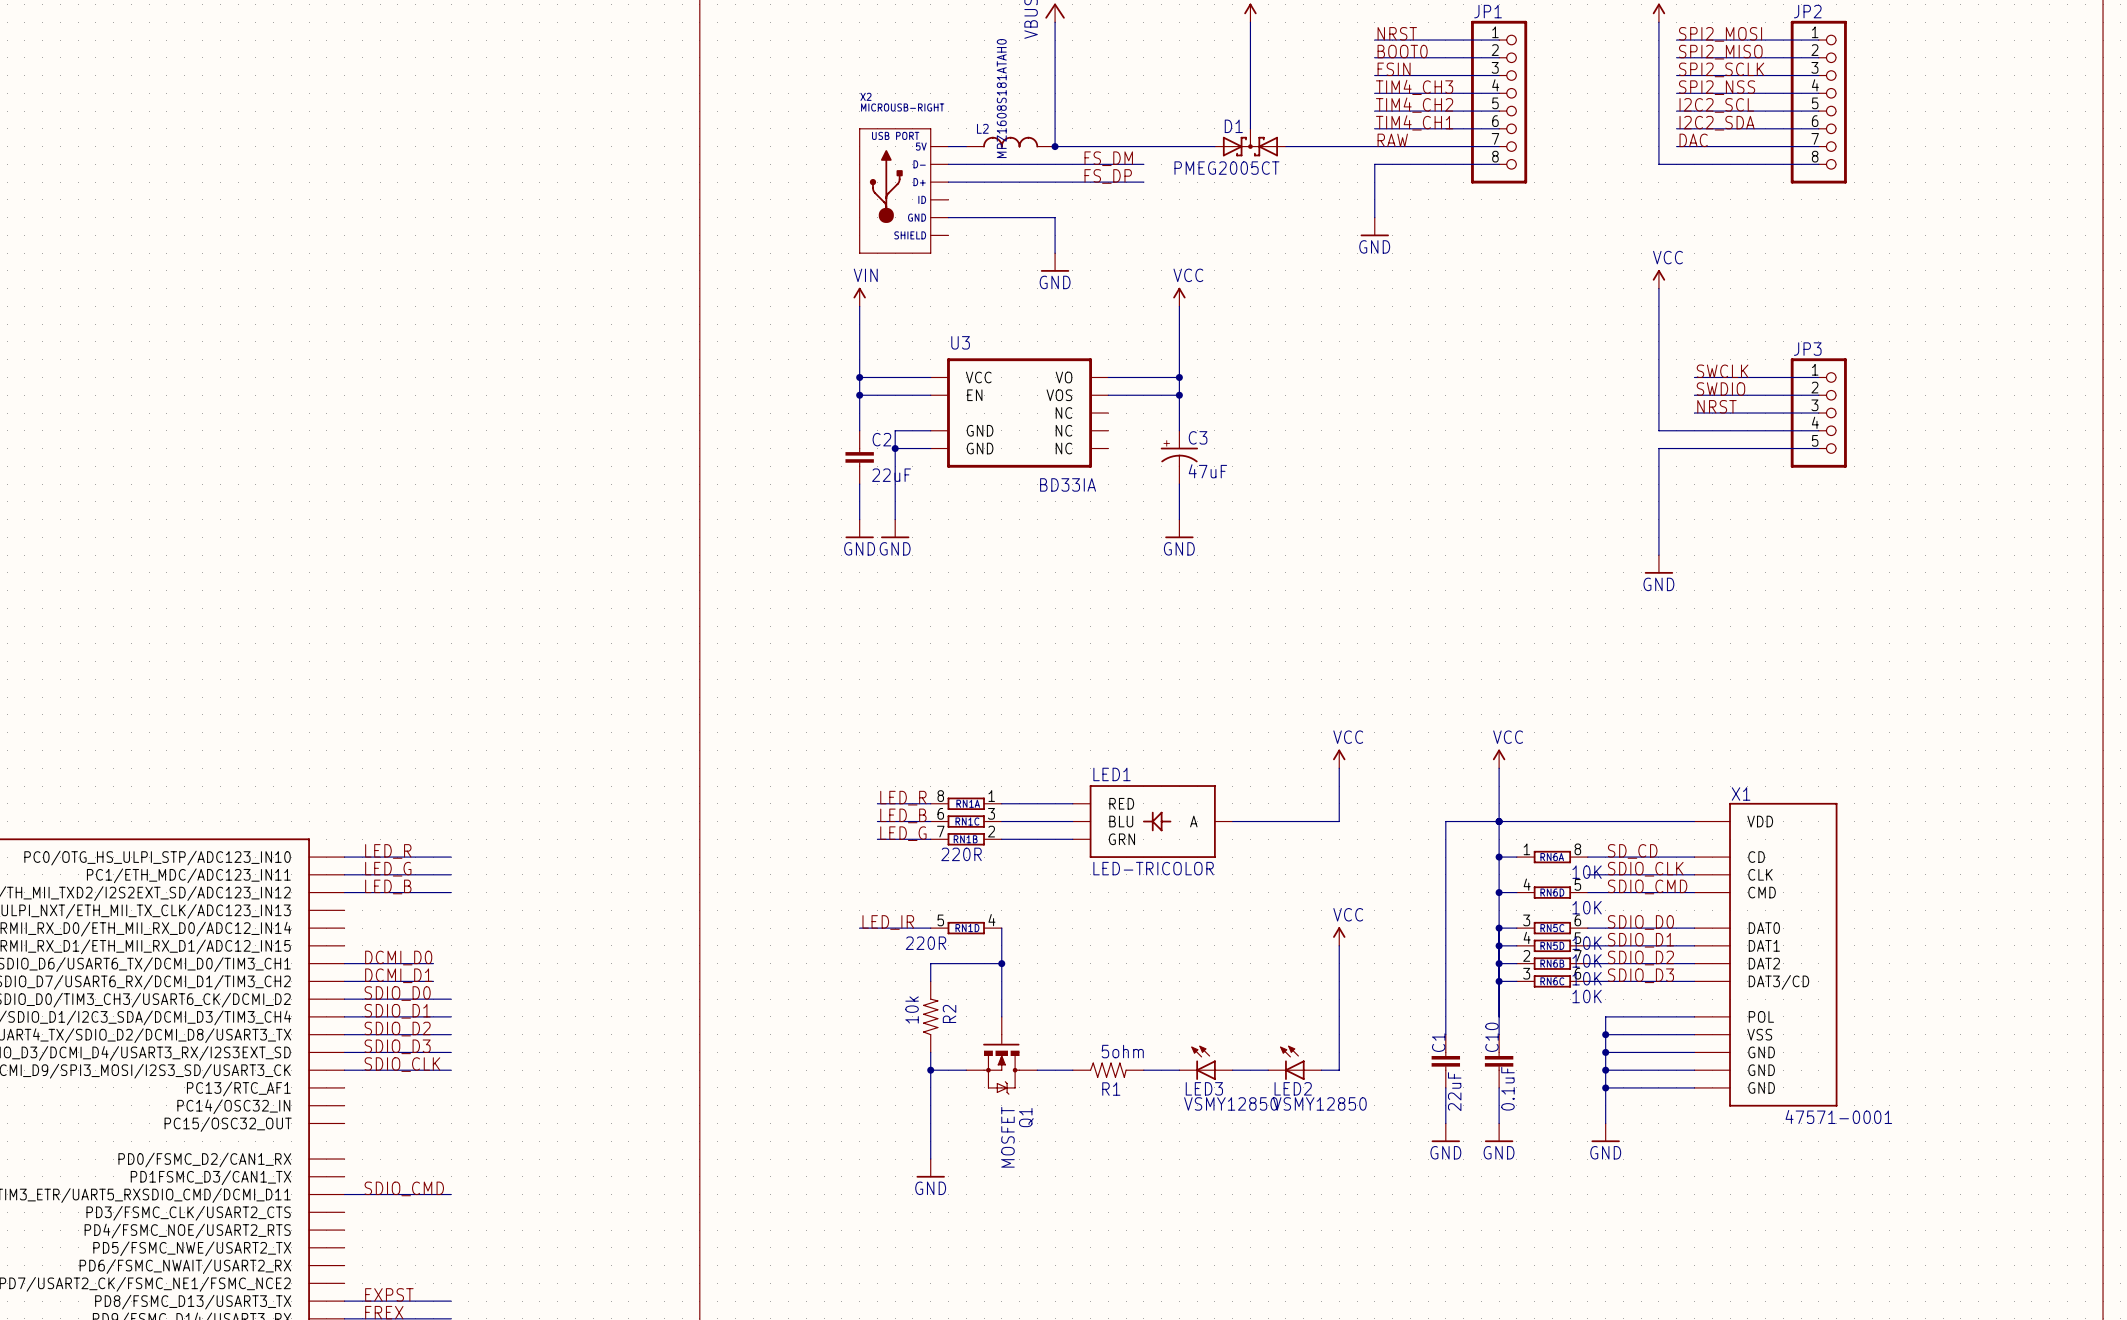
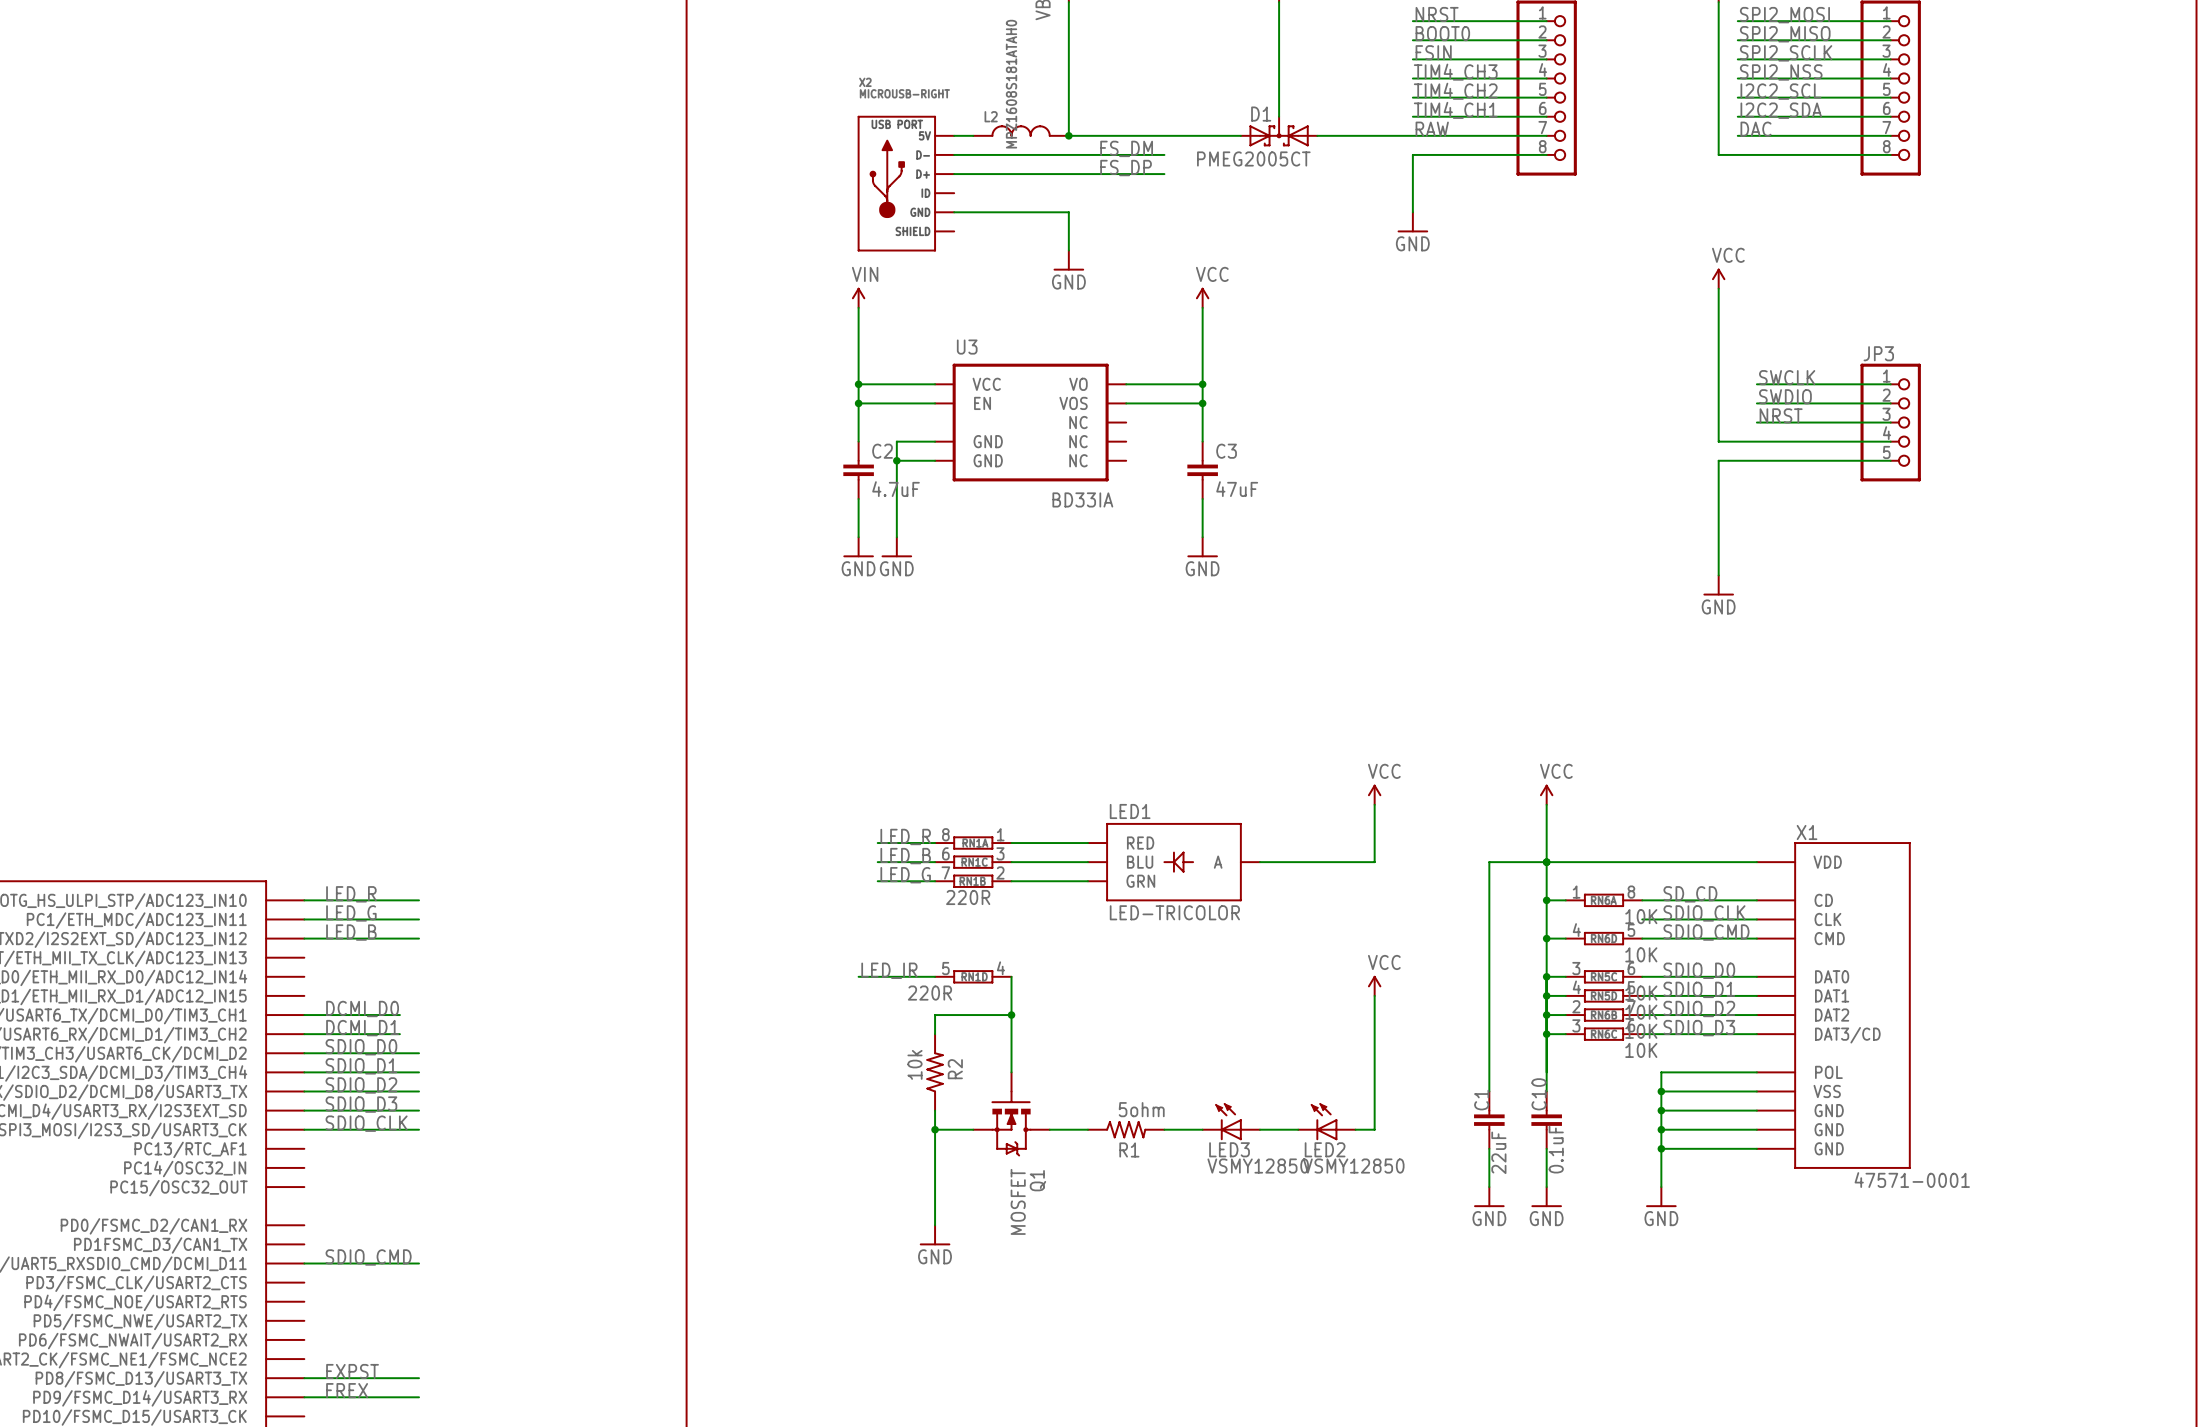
C3 symbol: [1160, 430, 1199, 485] -> [1187, 441, 1218, 499]
C2 value: 22uF (891, 475) -> 4.7uF (896, 489)

